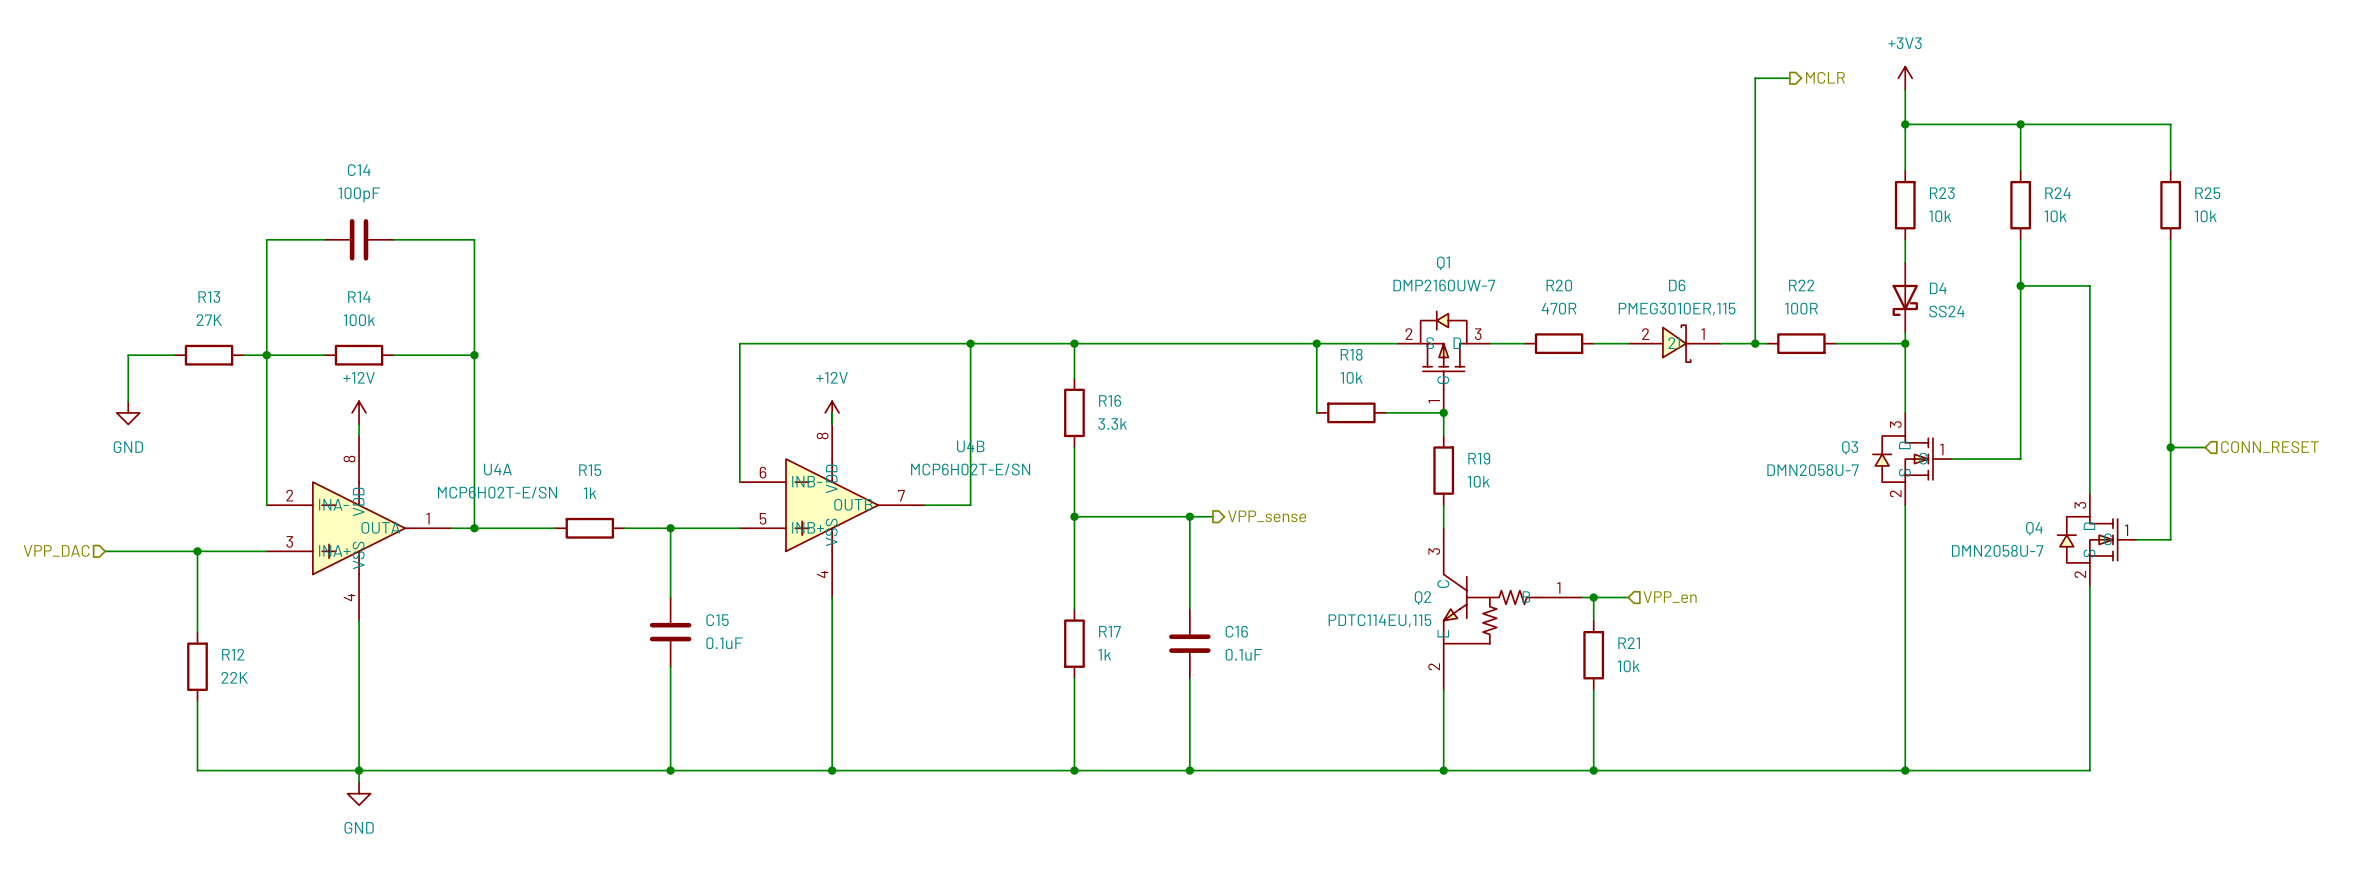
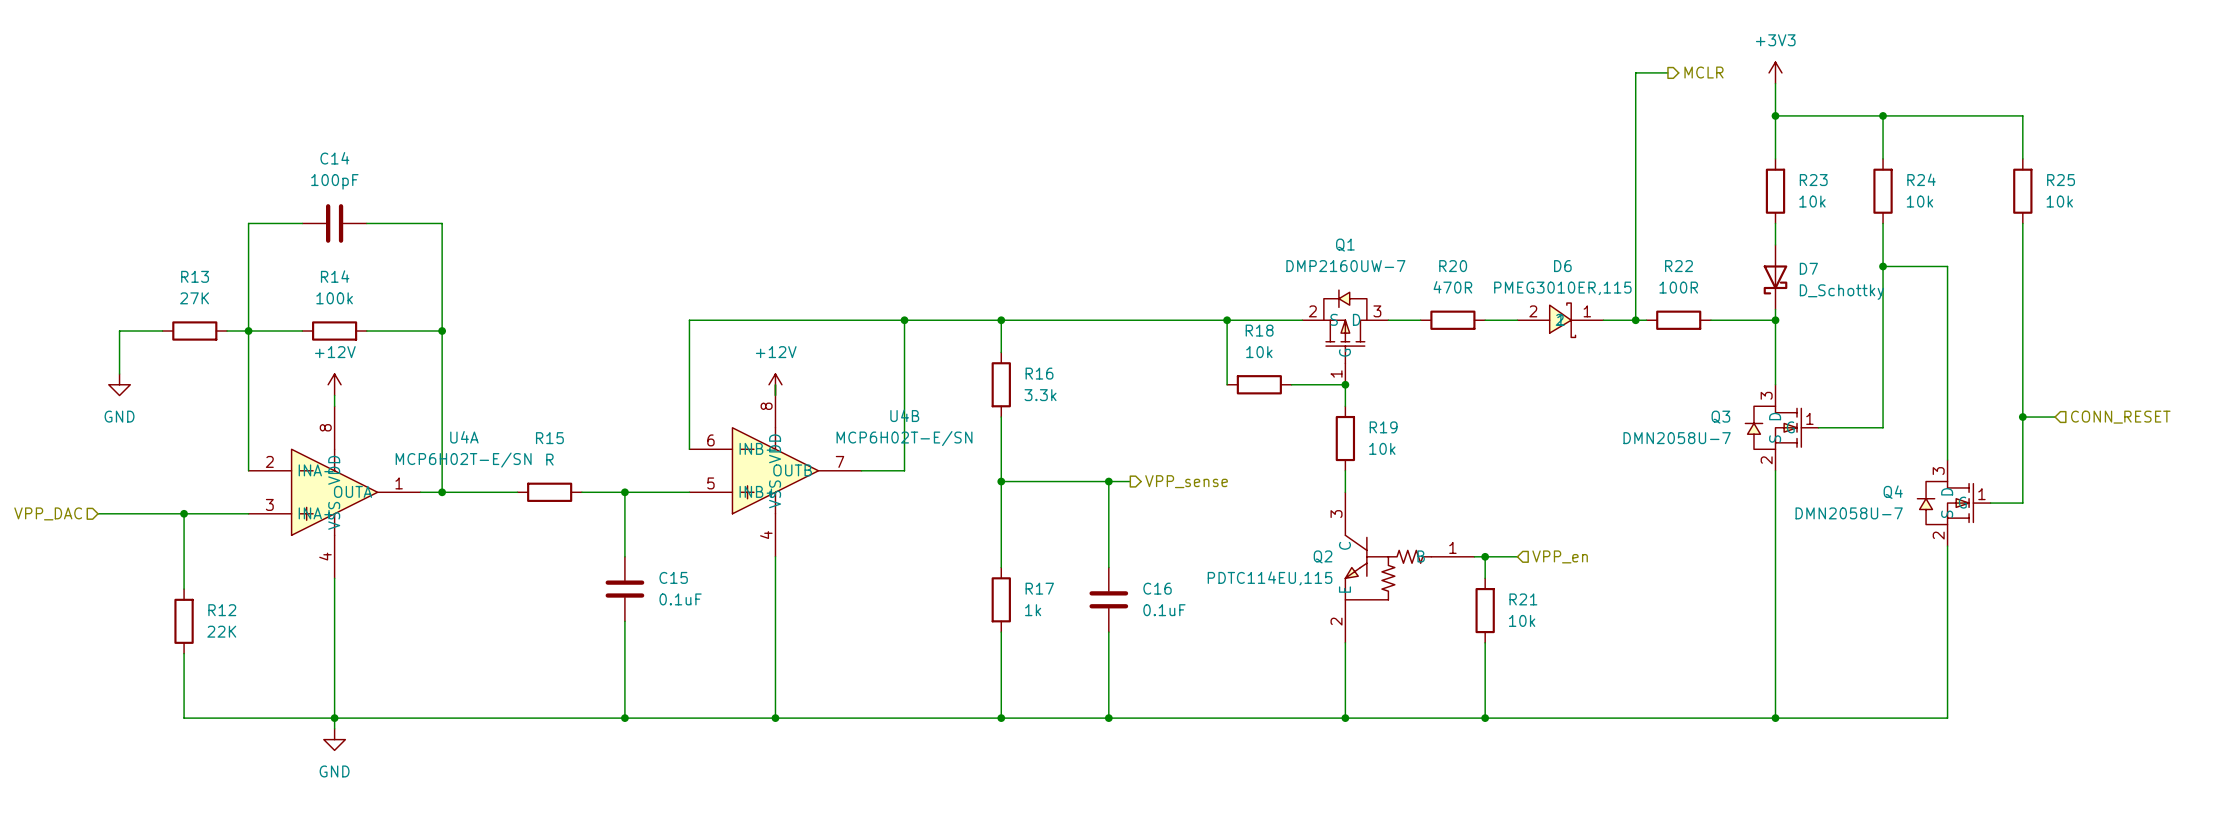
D4 name: D4 (1938, 288) -> D7 (1808, 268)
D4 value: SS24 (1946, 311) -> D_Schottky (1841, 292)
R15 value: 1k (590, 493) -> R (549, 459)

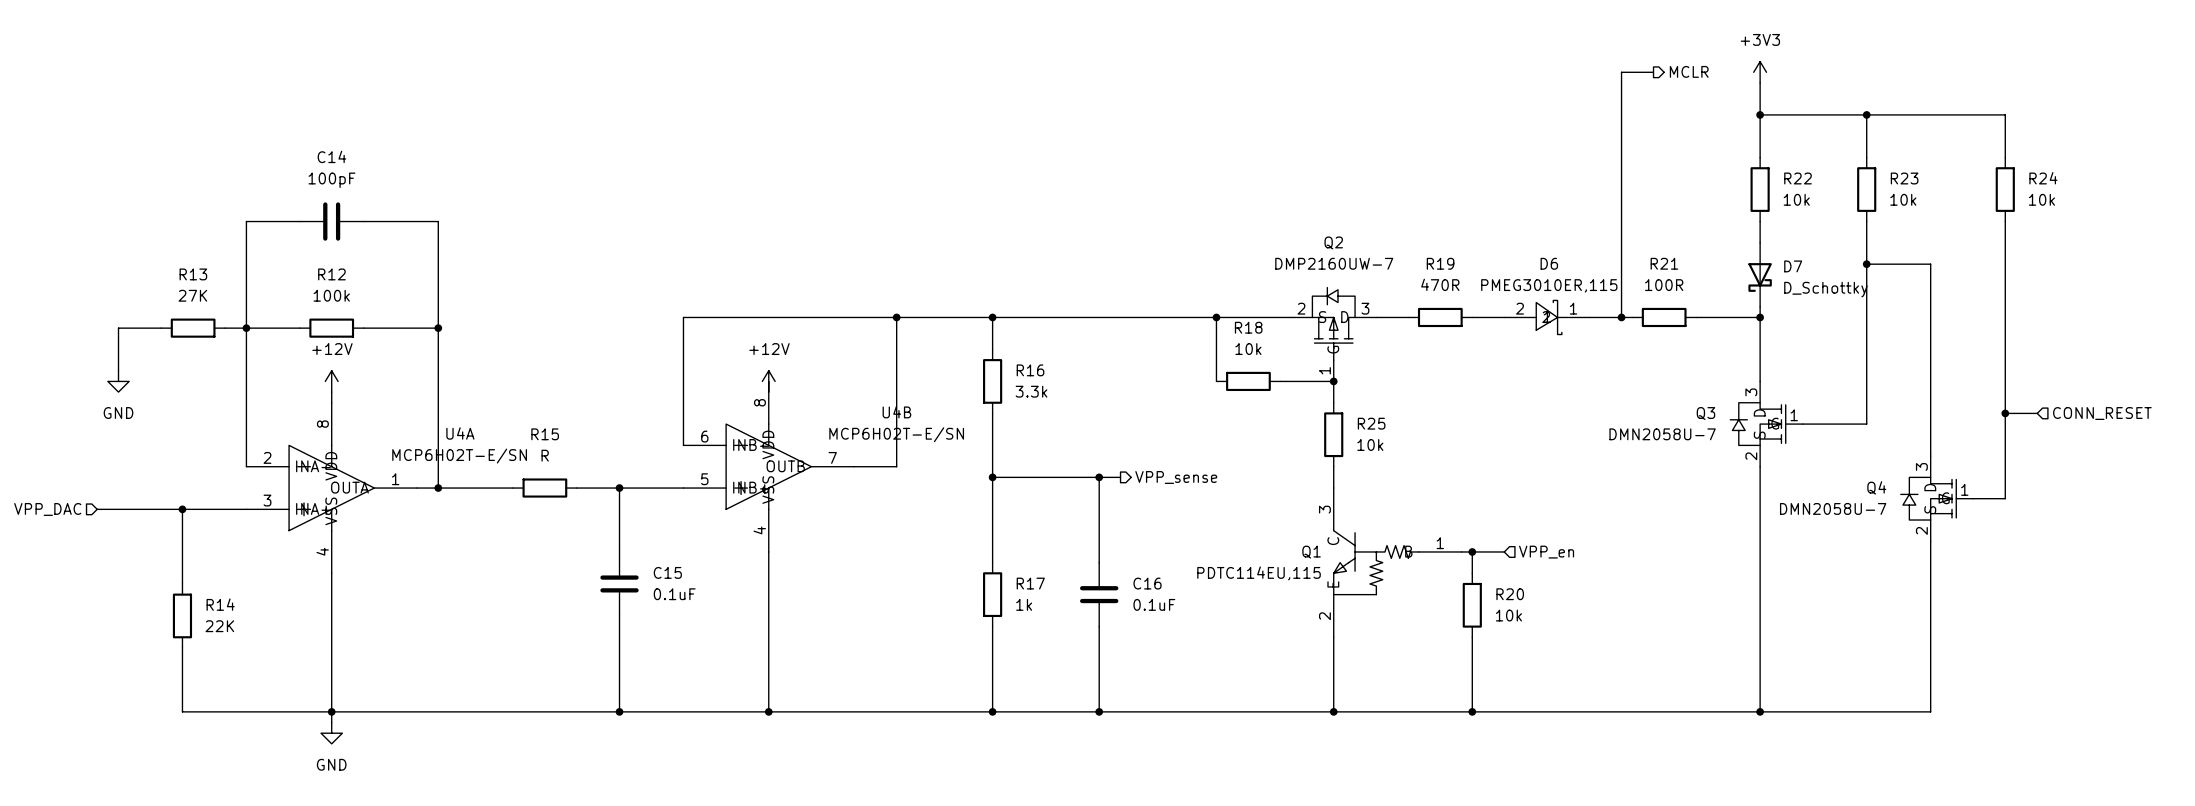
R24 name: R24 (1921, 179) -> R23 (1904, 178)
R23 name: R23 (1813, 180) -> R22 (1798, 178)
R25 name: R25 (2061, 180) -> R24 (2043, 178)
Q1 name: Q1 (1345, 245) -> Q2 (1333, 242)
R20 name: R20 (1453, 266) -> R19 (1440, 263)
R22 name: R22 (1678, 266) -> R21 (1664, 263)
R14 name: R14 (335, 276) -> R12 (331, 274)
R19 name: R19 (1383, 427) -> R25 (1371, 423)
Q2 name: Q2 (1323, 556) -> Q1 (1311, 552)
R21 name: R21 (1523, 599) -> R20 (1510, 594)
R12 name: R12 (222, 610) -> R14 (220, 604)

